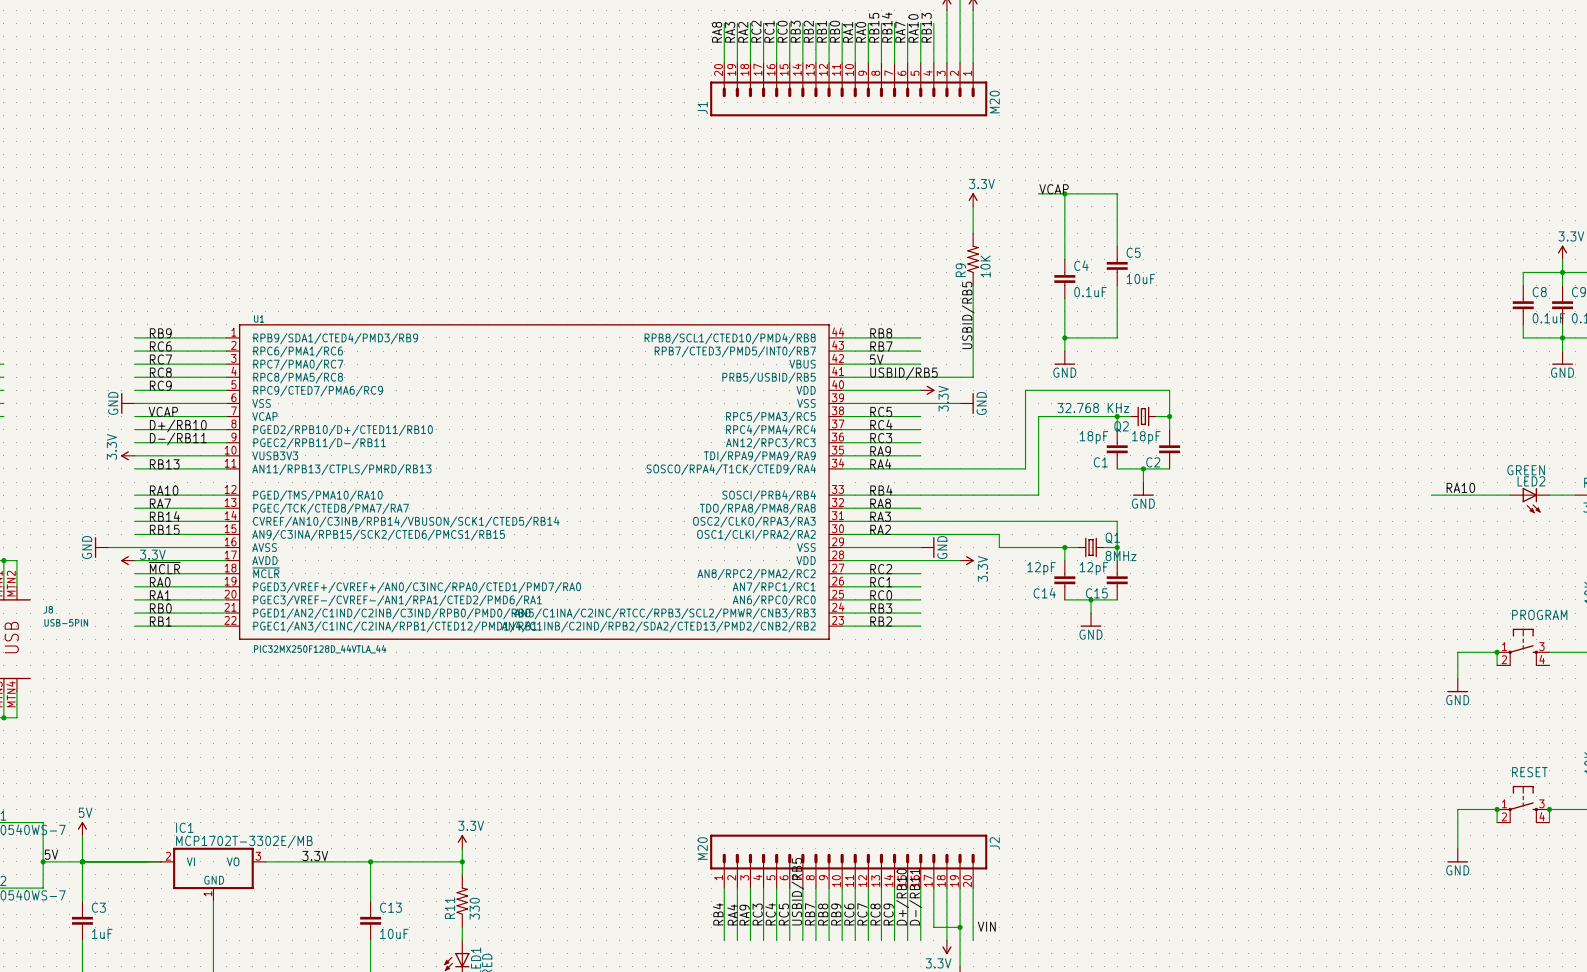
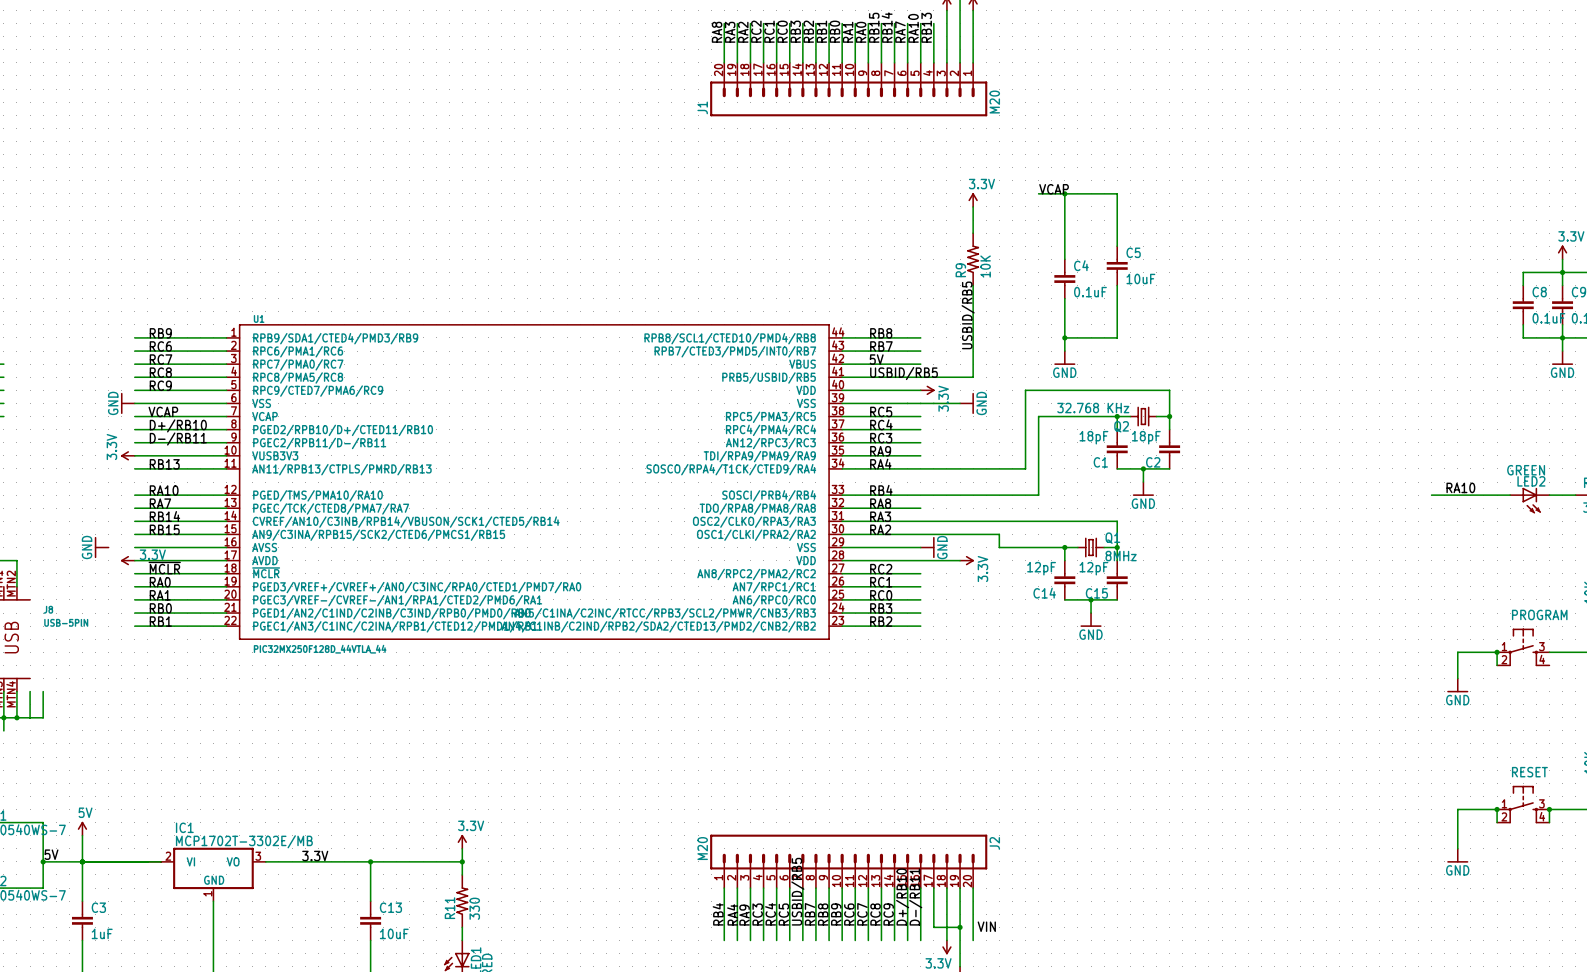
wire: (108, 547) (134, 547) -> none
wire: (3, 560) (3, 586) -> none
junction: (3, 560) -> none
wire: none -> (30, 691) (30, 717)
wire: none -> (43, 691) (43, 717) (16, 717)
wire: none -> (3, 717) (3, 730)
junction: none -> (16, 717)

